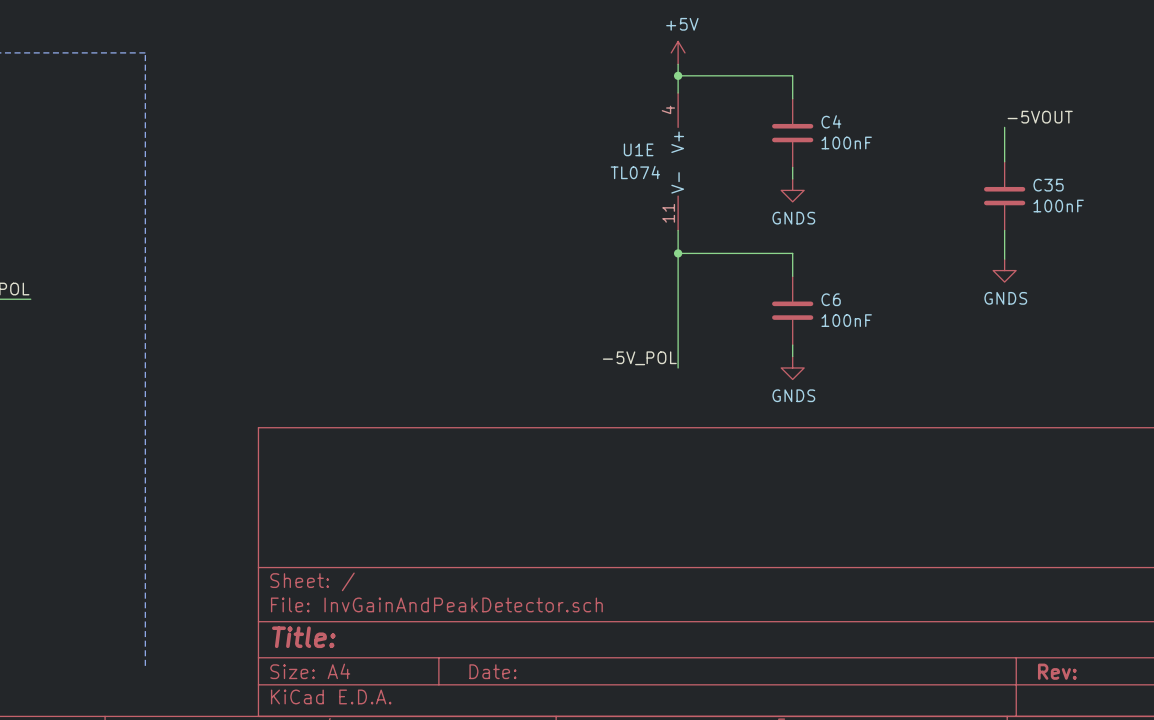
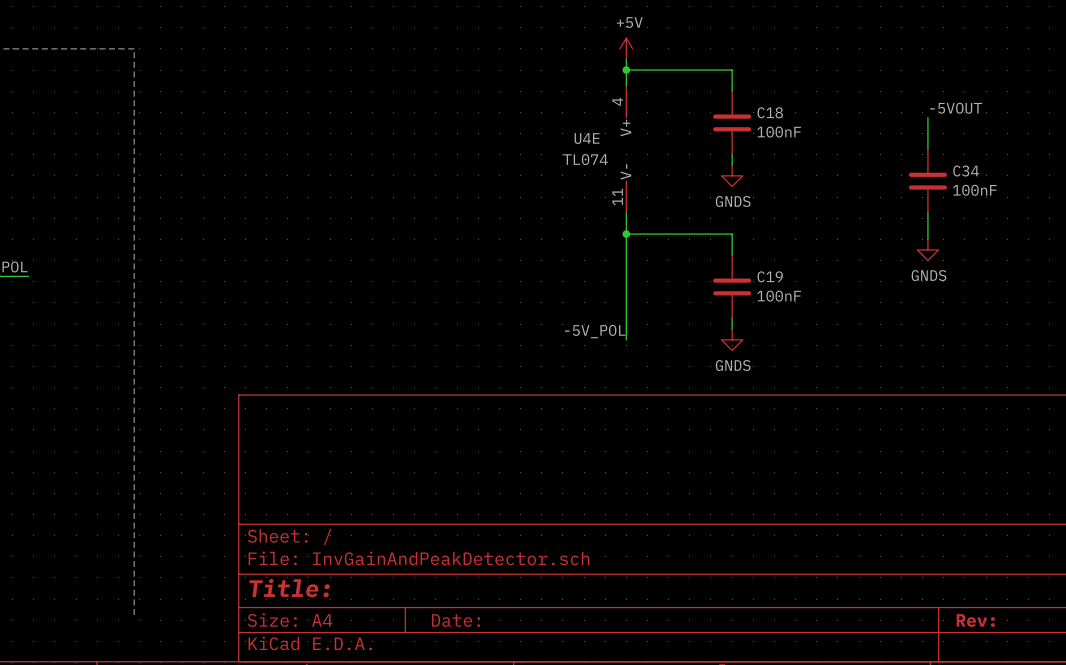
C4 name: C4 (831, 121) -> C18 (770, 112)
U1E name: U1E (638, 149) -> U4E (587, 138)
C35 name: C35 (1048, 185) -> C34 (966, 171)
C6 name: C6 (831, 299) -> C19 (770, 276)

